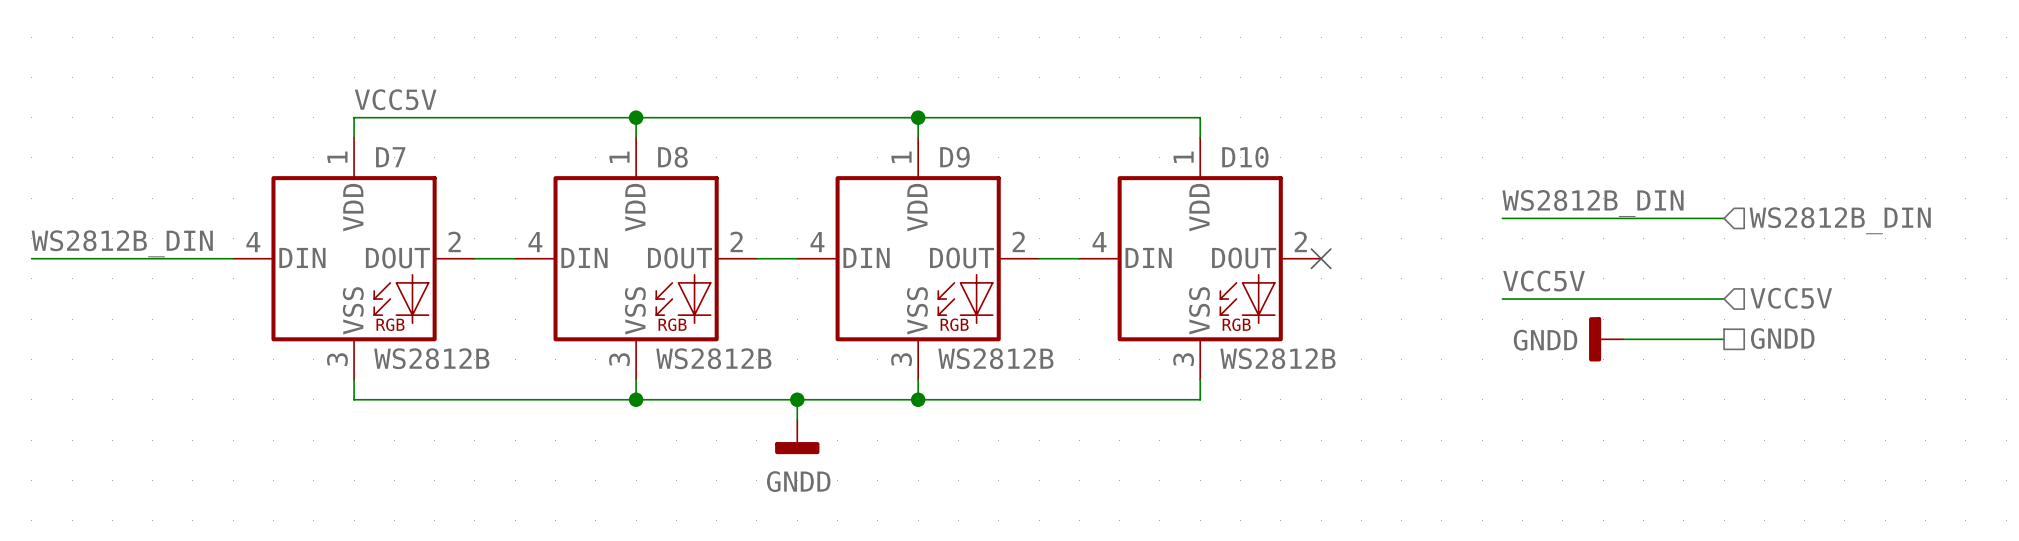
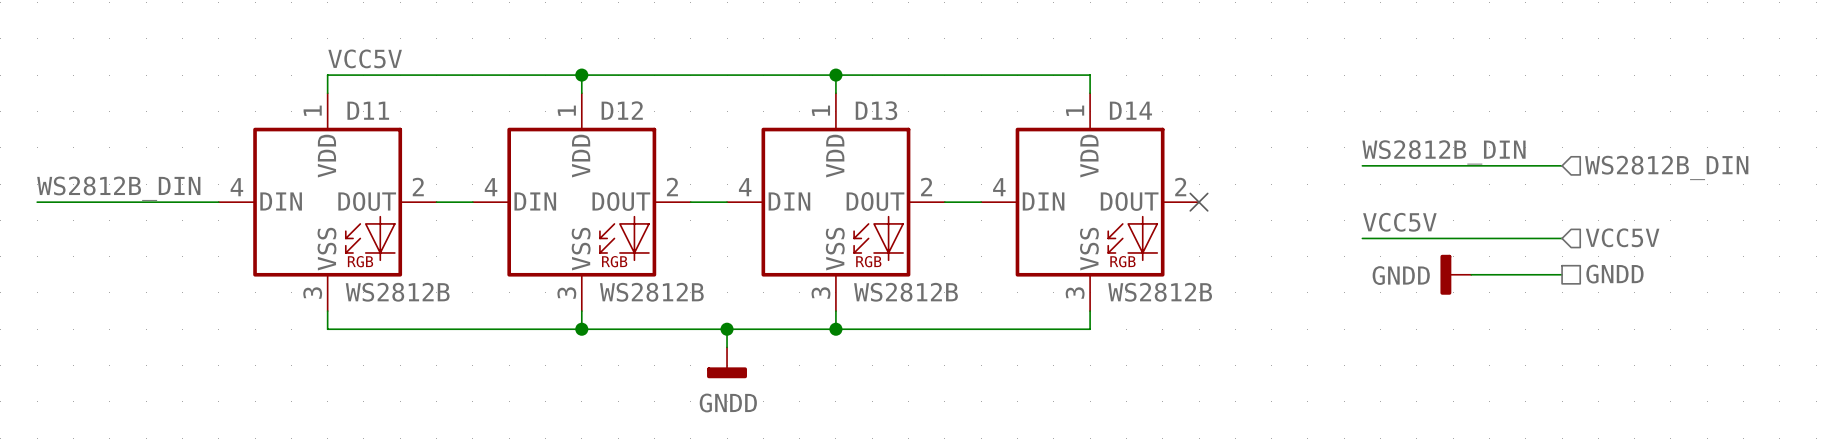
D7 name: D7 (390, 157) -> D11 (368, 110)
D8 name: D8 (672, 157) -> D12 (622, 110)
D9 name: D9 (954, 157) -> D13 (876, 110)
D10 name: D10 (1245, 157) -> D14 (1130, 110)

